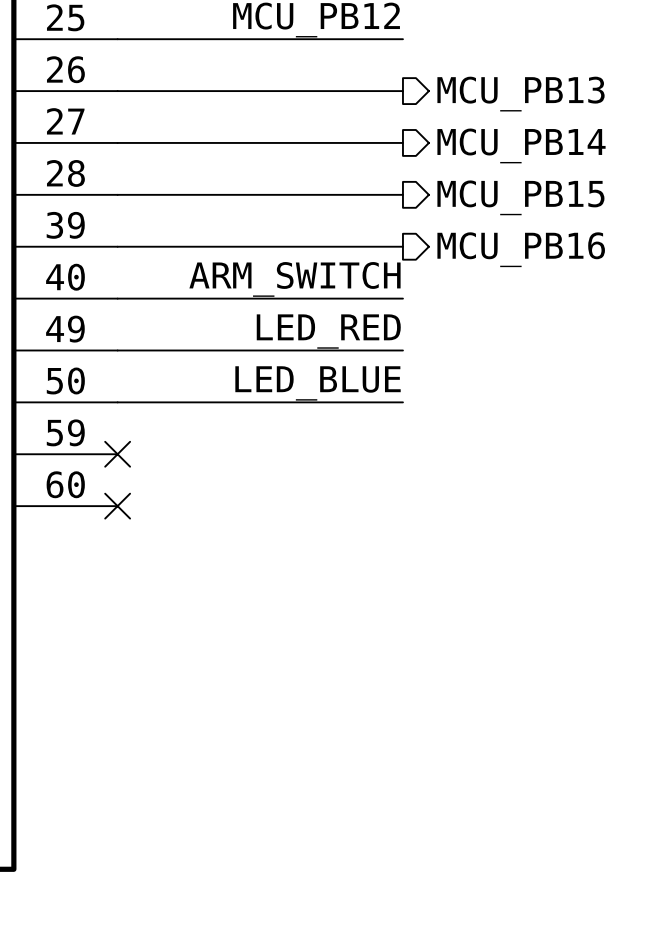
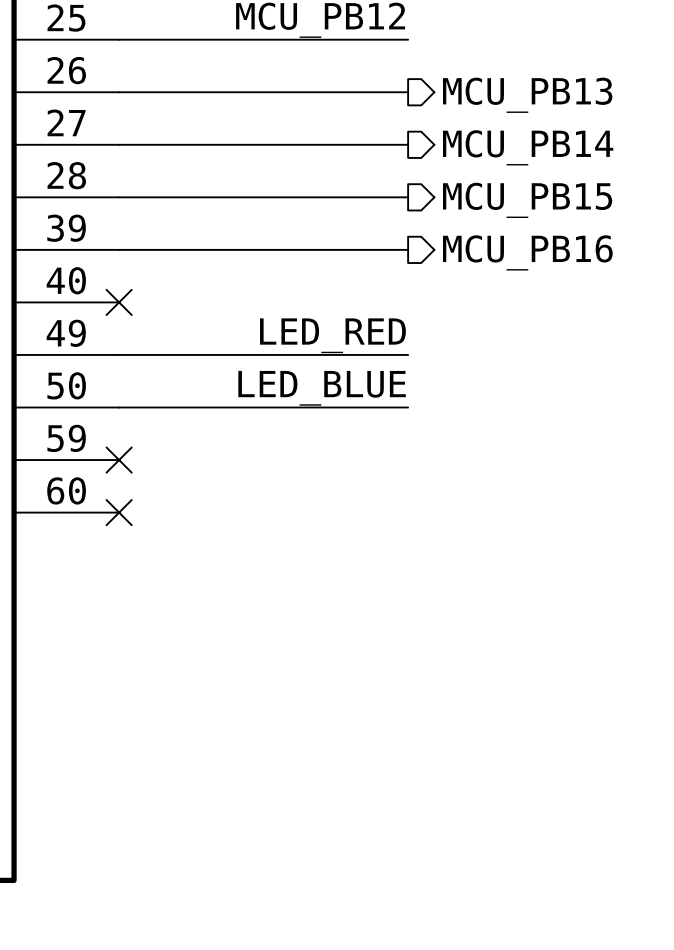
label: ARM_SWITCH (295, 279) -> none
wire: (117, 298) (402, 298) -> none
no-connect mark: none -> (119, 302)

